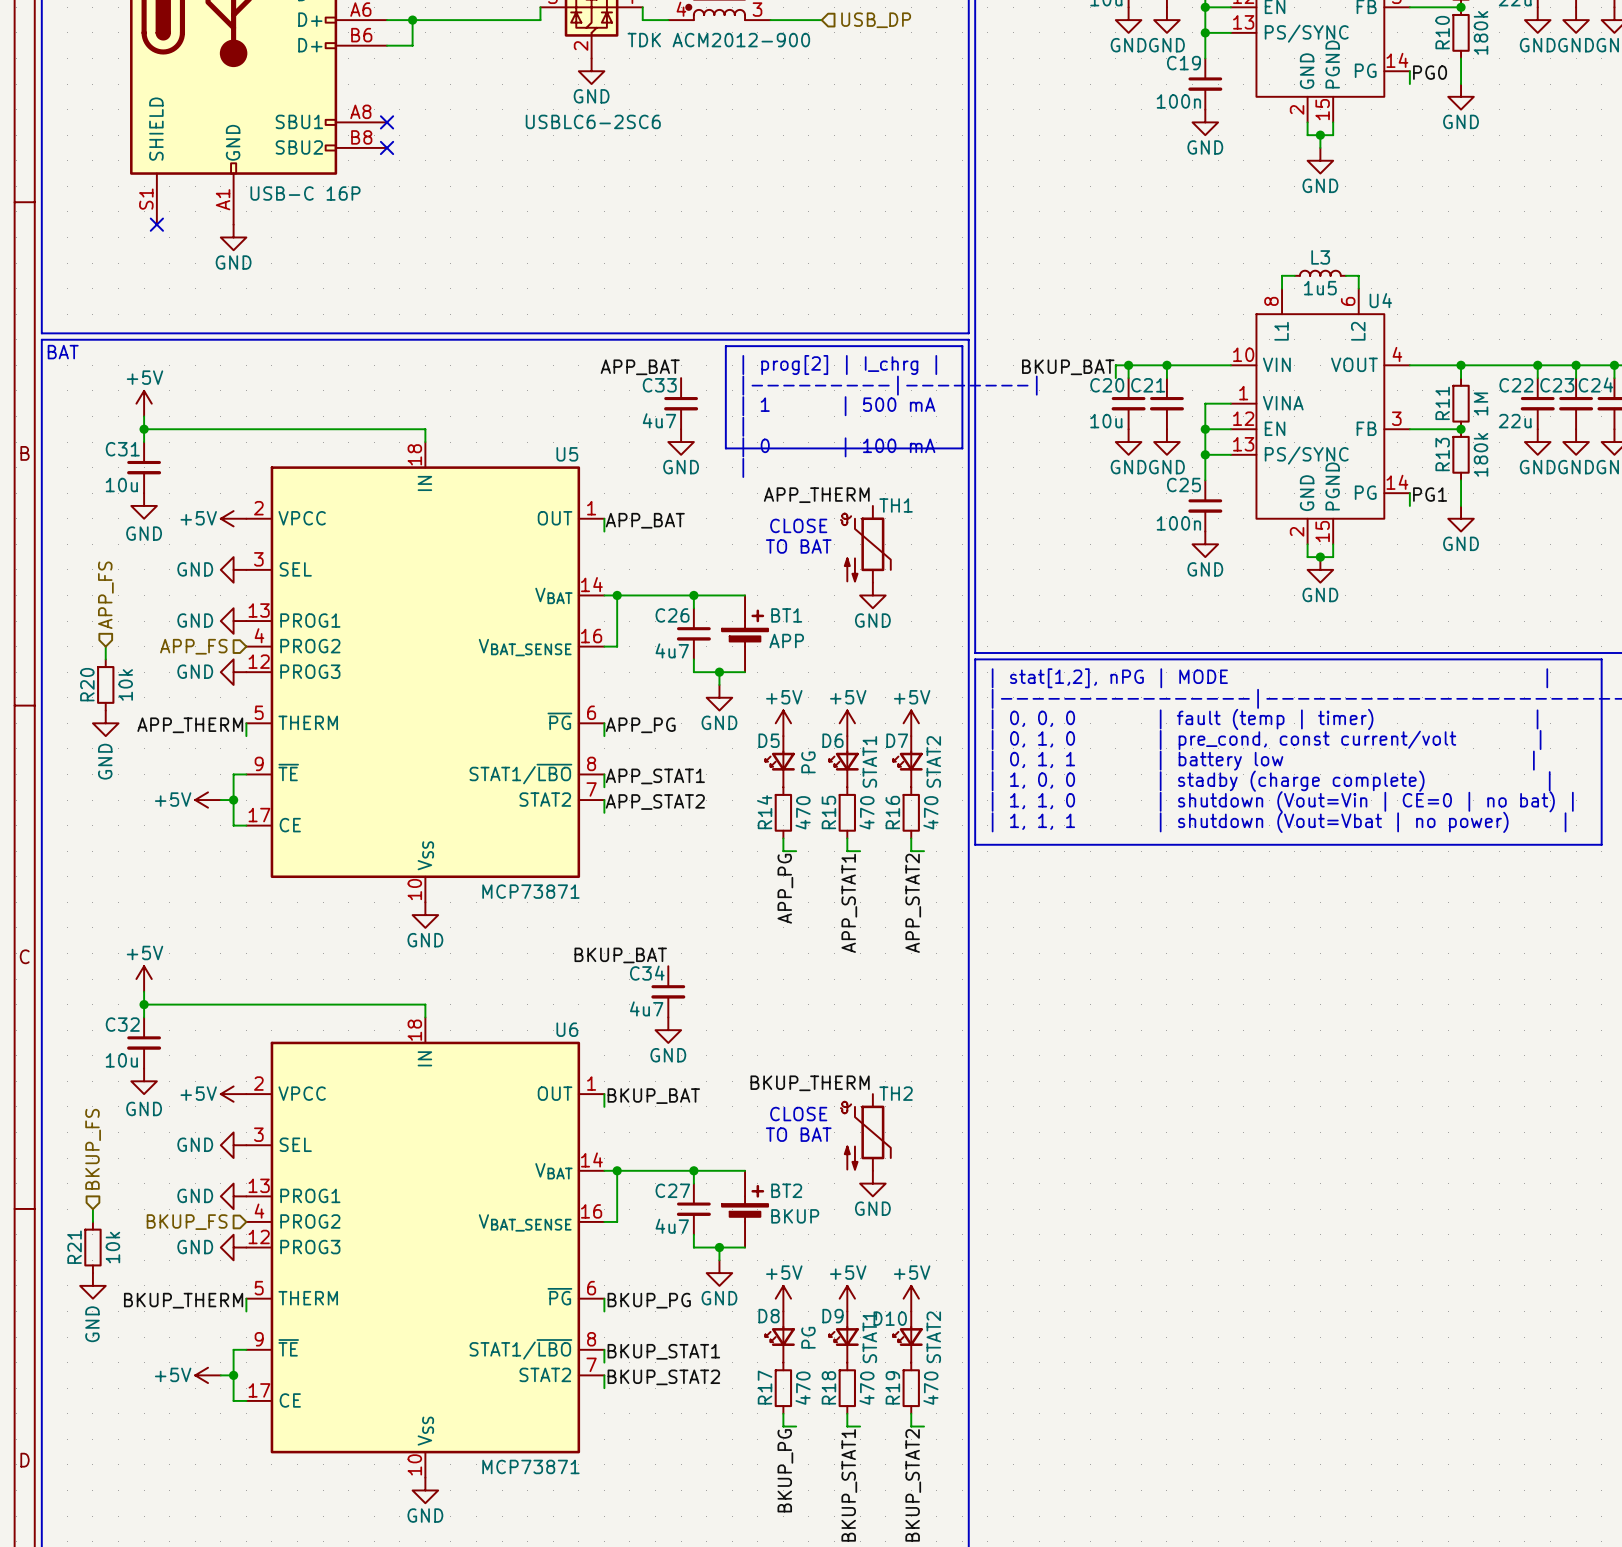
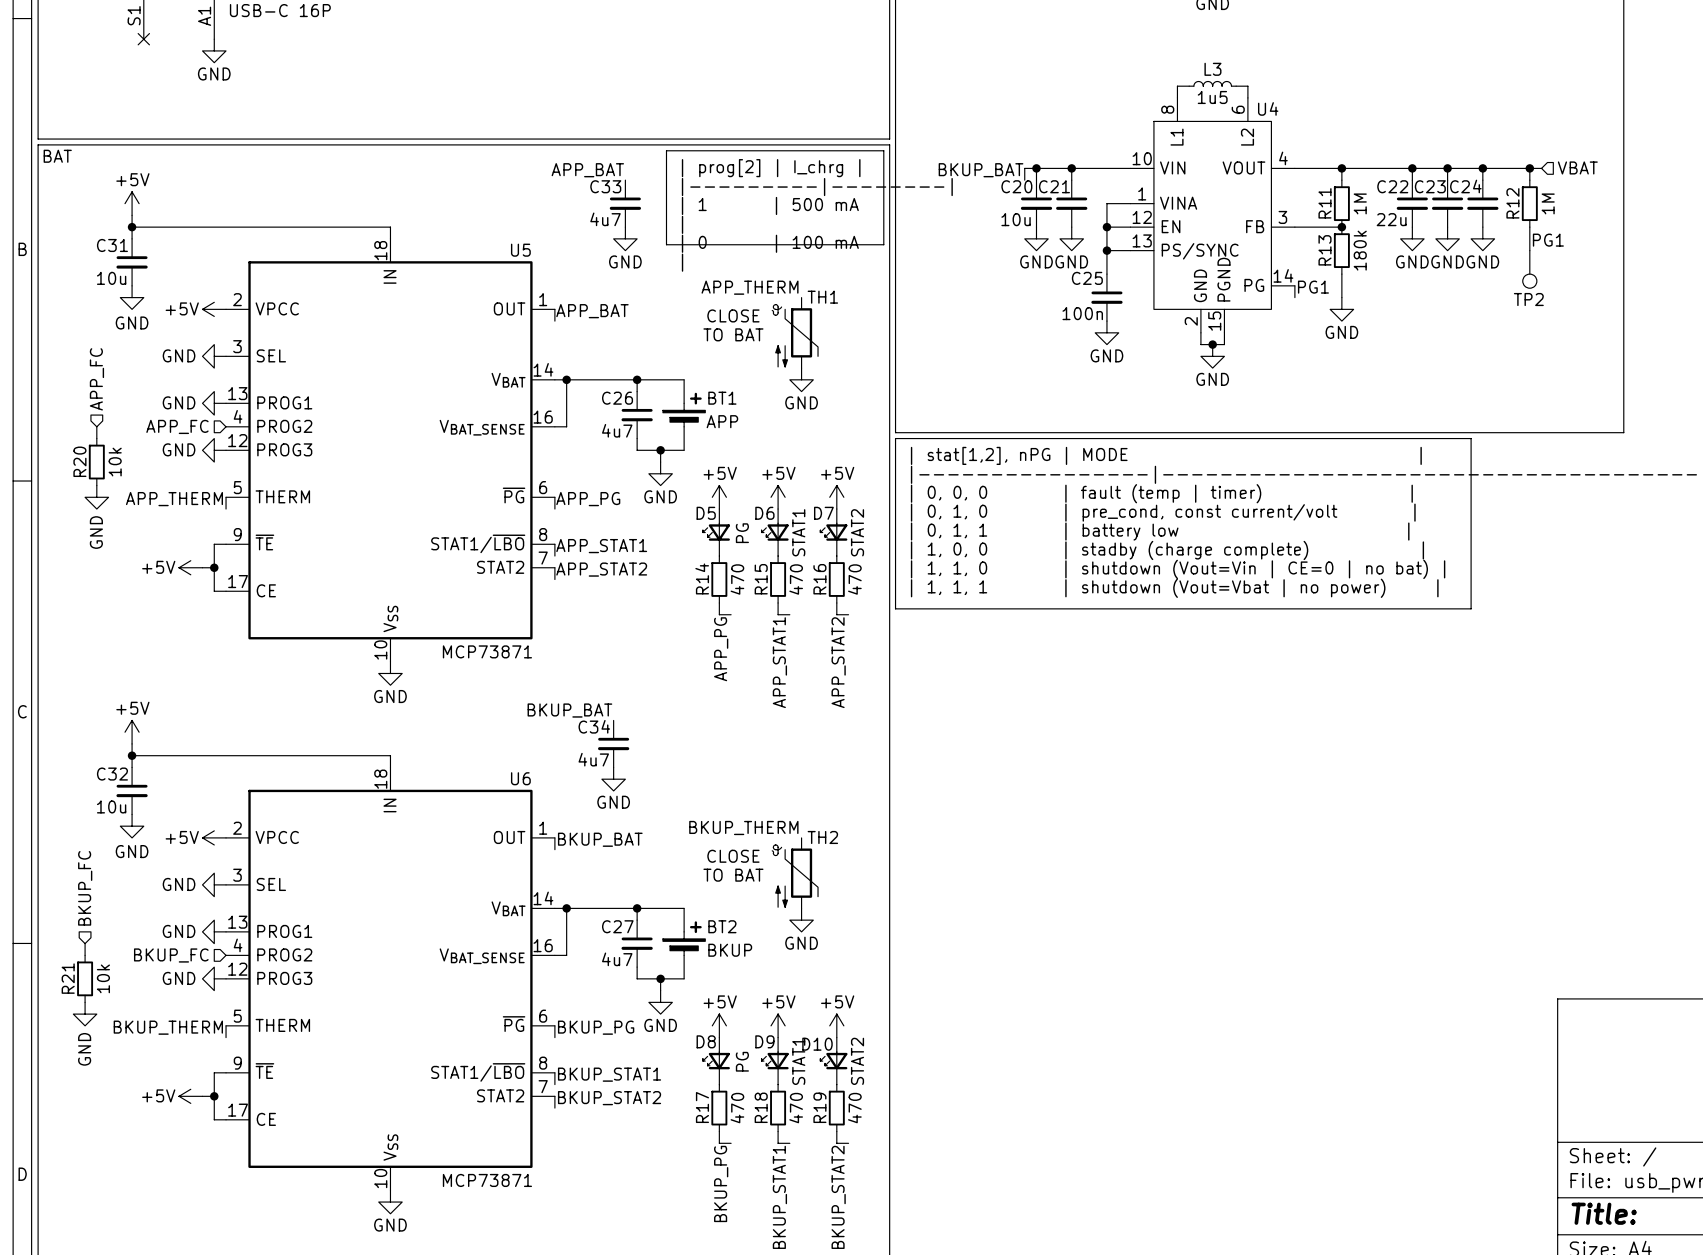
hierarchical label: APP_FS (105, 595) -> APP_FC (96, 379)
hierarchical label: APP_FS (193, 646) -> APP_FC (177, 426)
hierarchical label: BKUP_FS (93, 1149) -> BKUP_FC (85, 888)
hierarchical label: BKUP_FS (187, 1222) -> BKUP_FC (171, 955)

